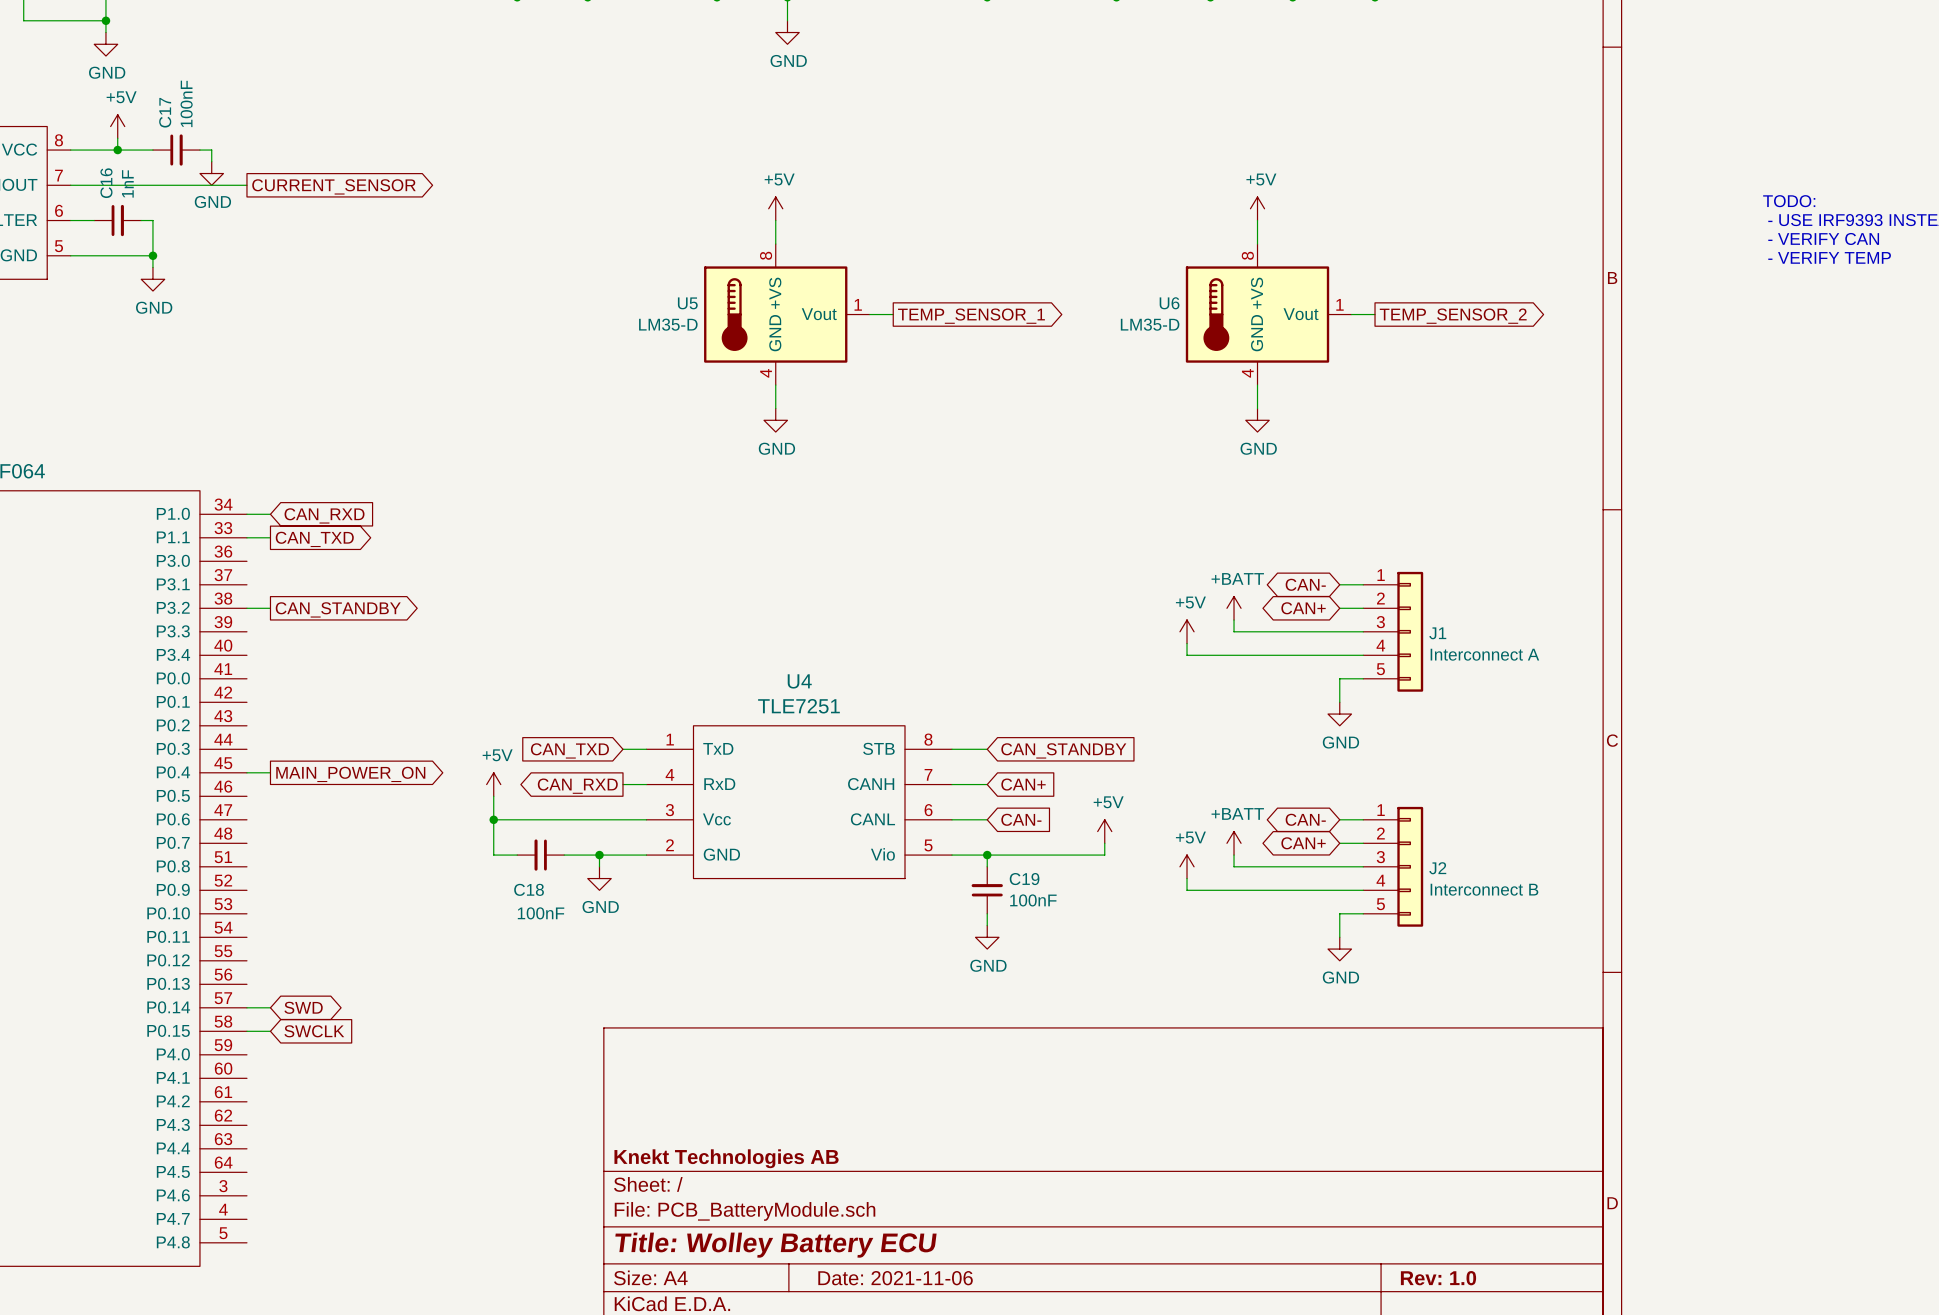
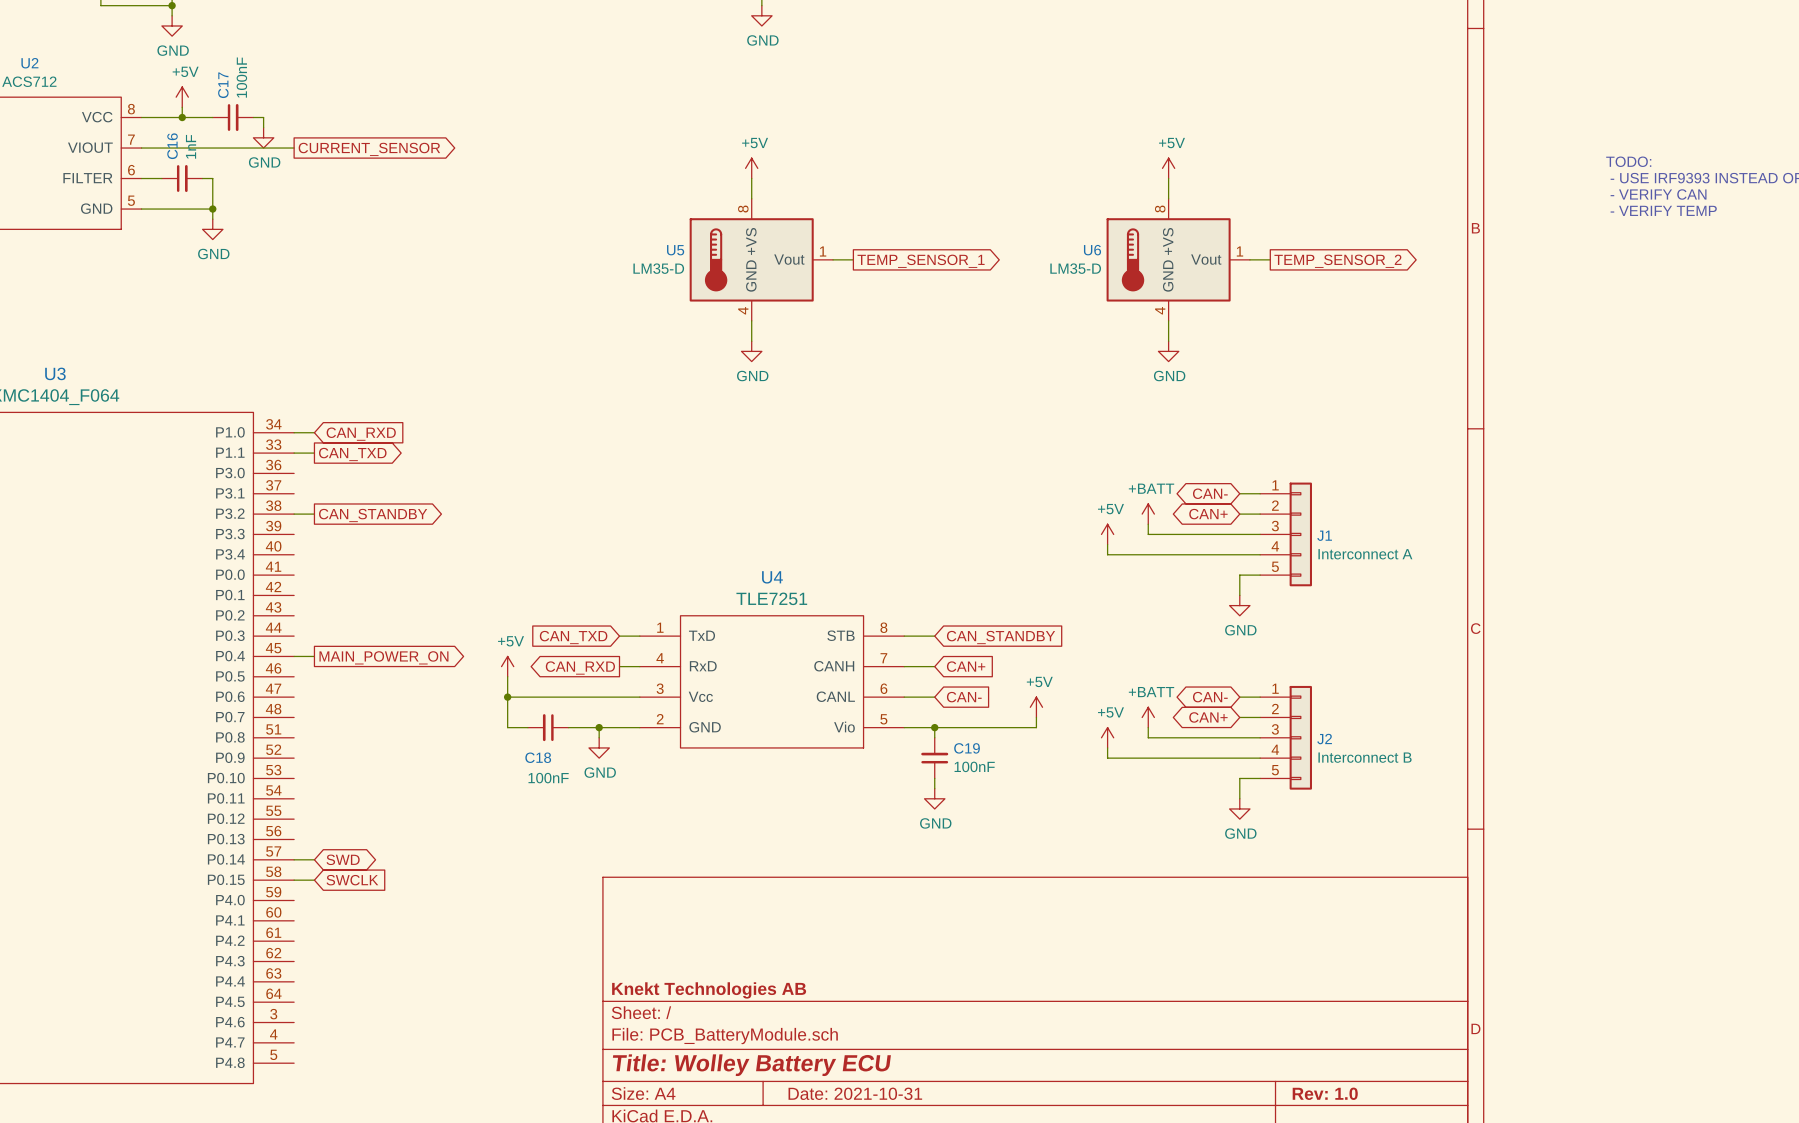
title block: Date: 2021-11-06 (895, 1278) -> Date: 2021-10-31 (855, 1093)

